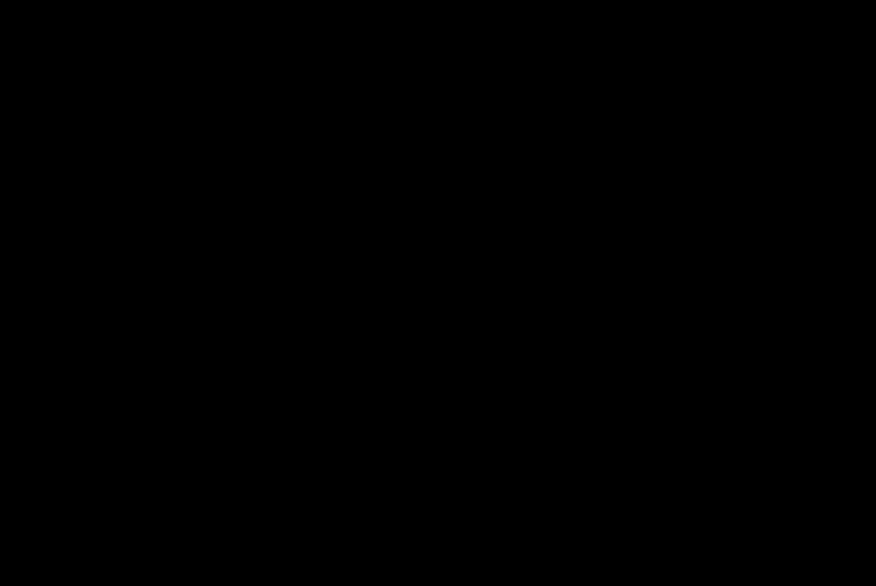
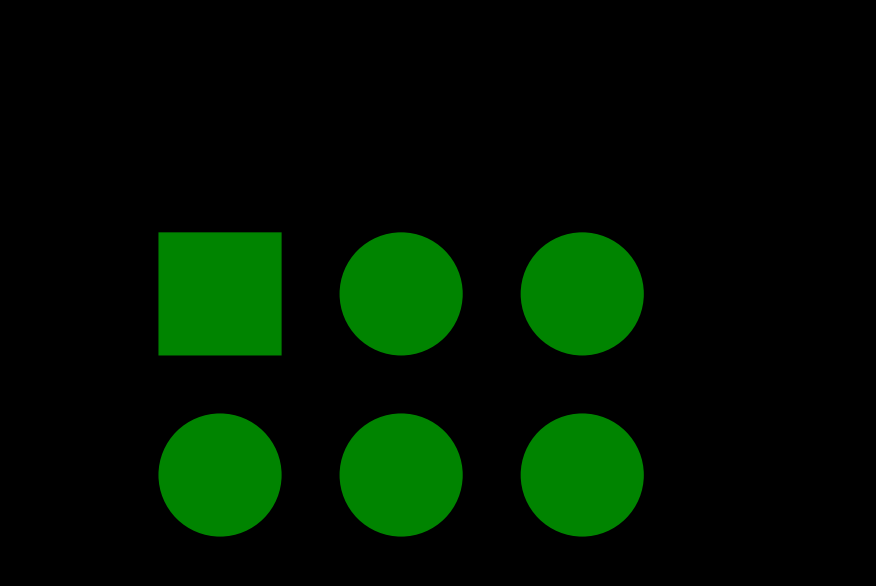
part: none -> (401, 384)

